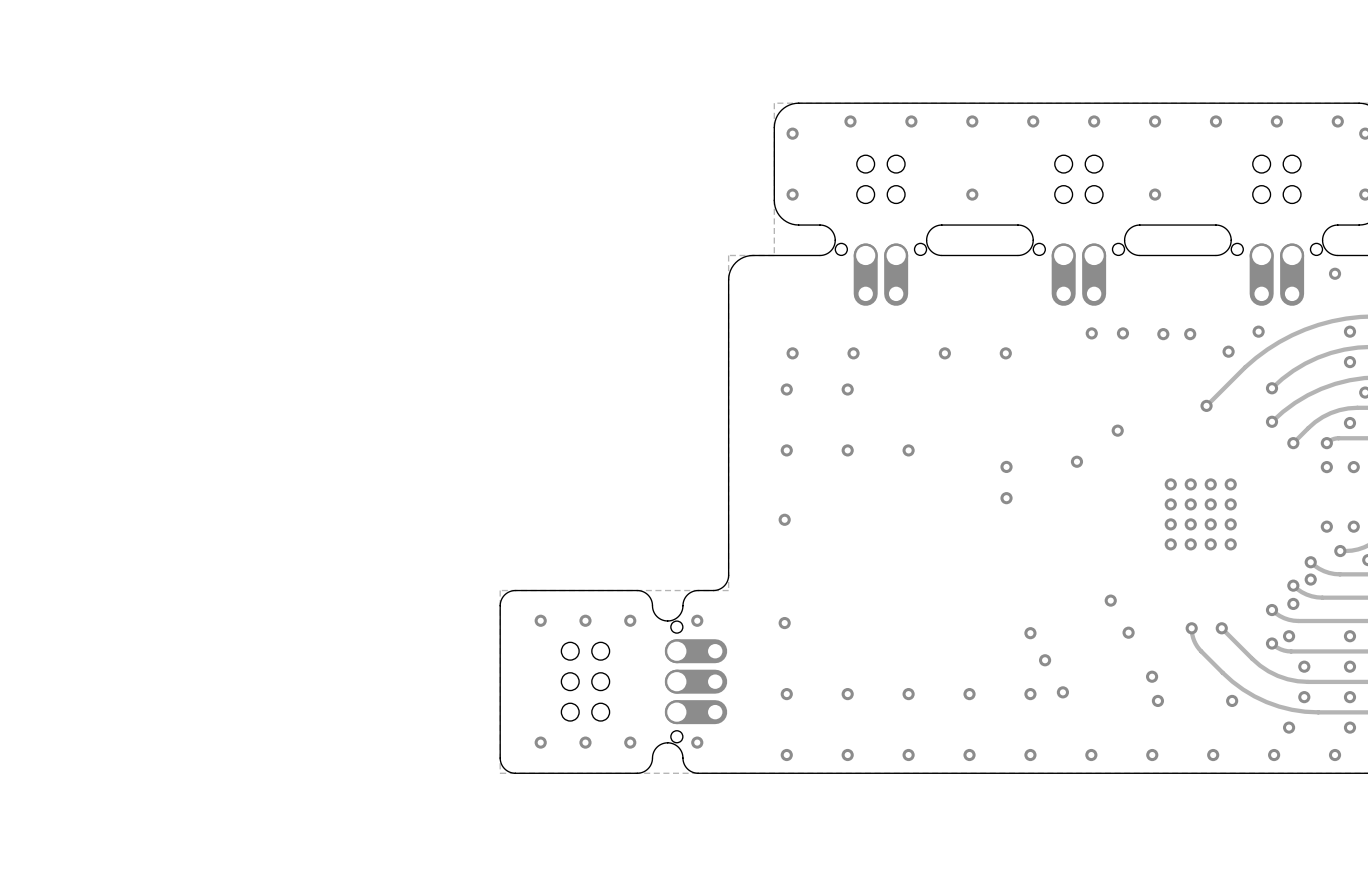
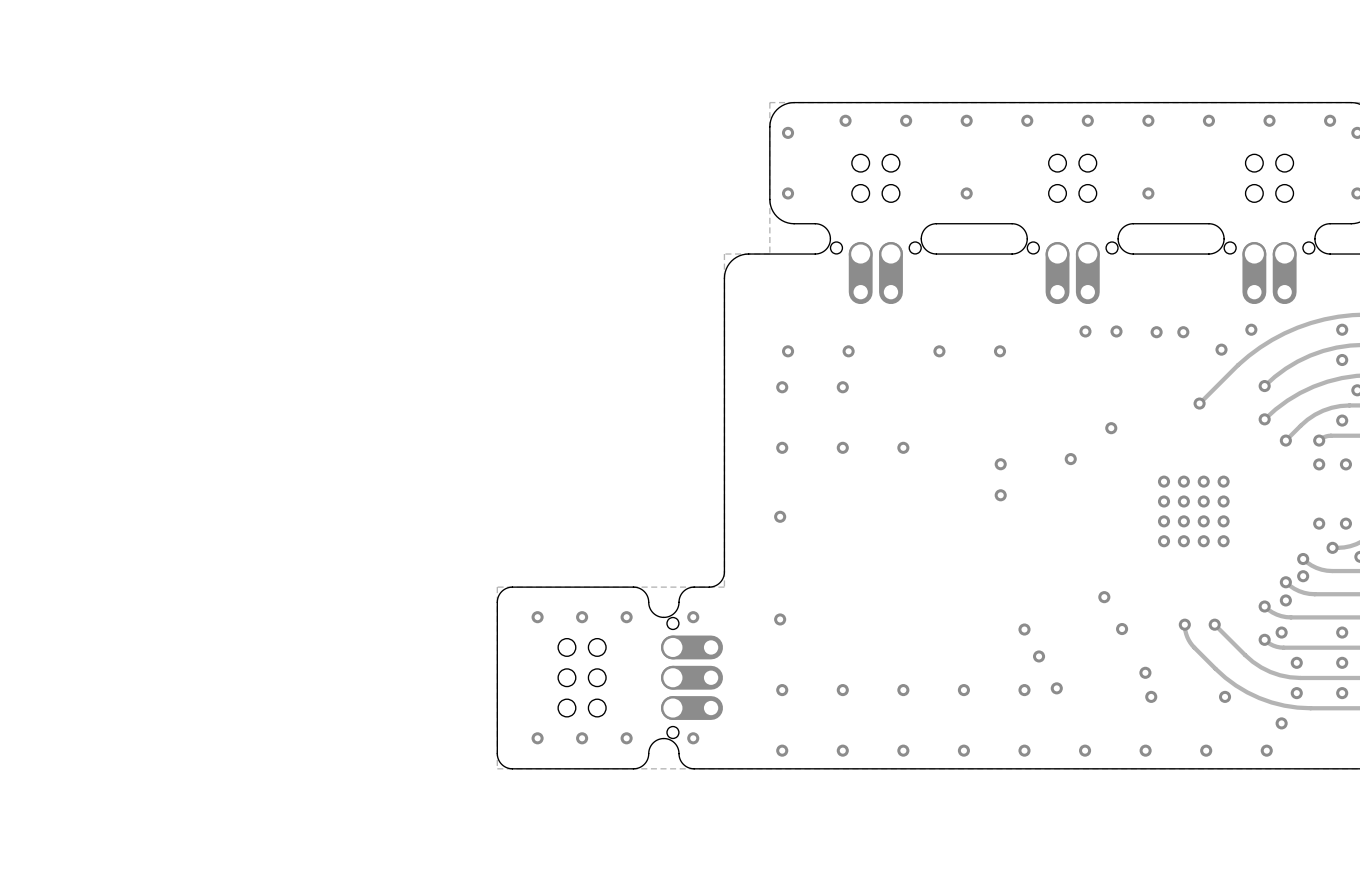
via: (1335, 273) -> none
via: (1349, 727) -> none
via: (1335, 755) -> none

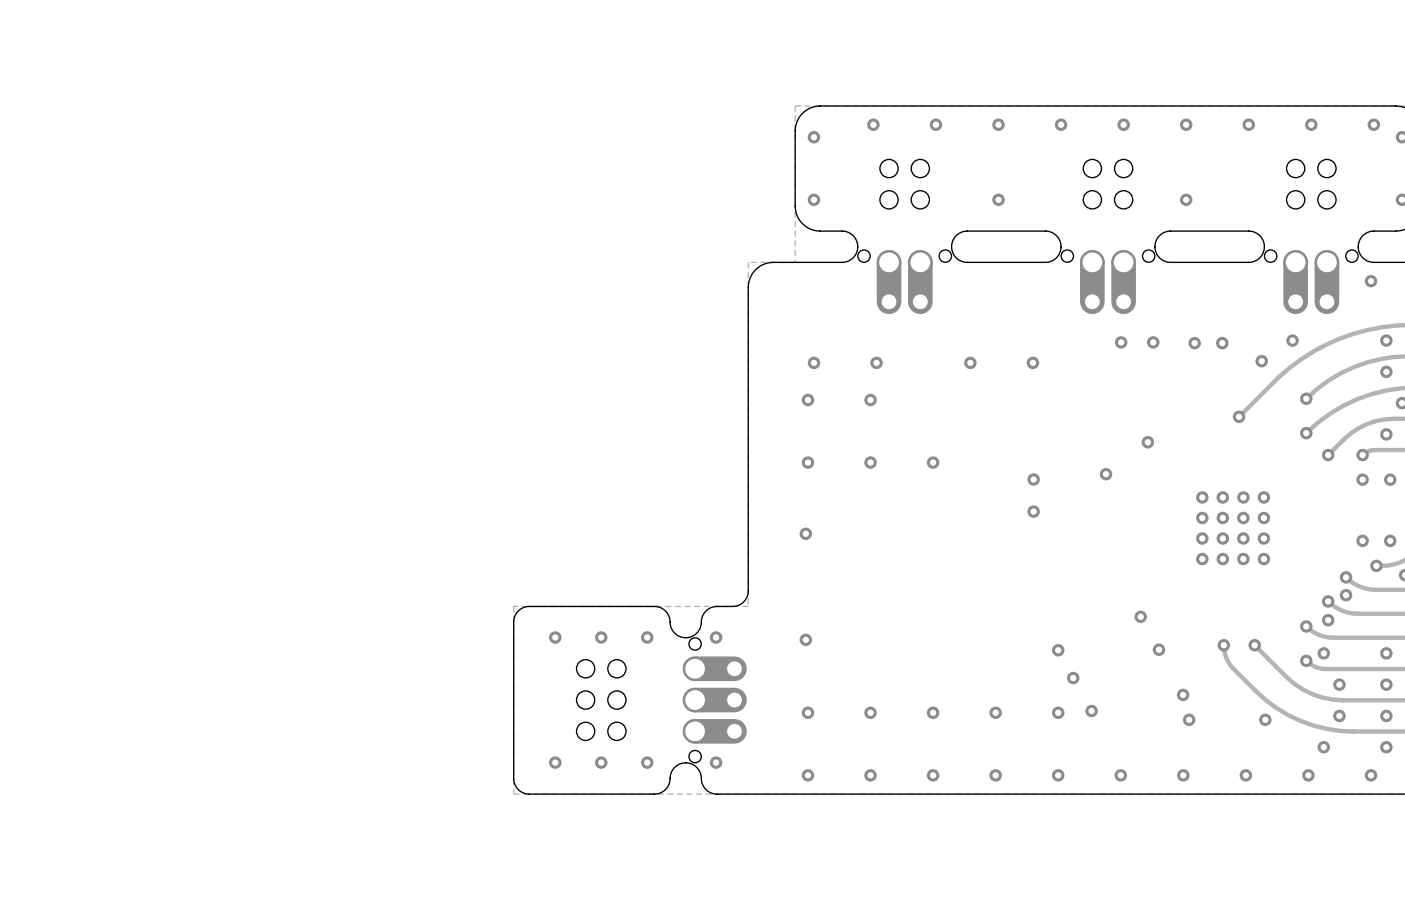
via: none -> (1371, 281)
via: none -> (1386, 747)
via: none -> (1371, 775)

